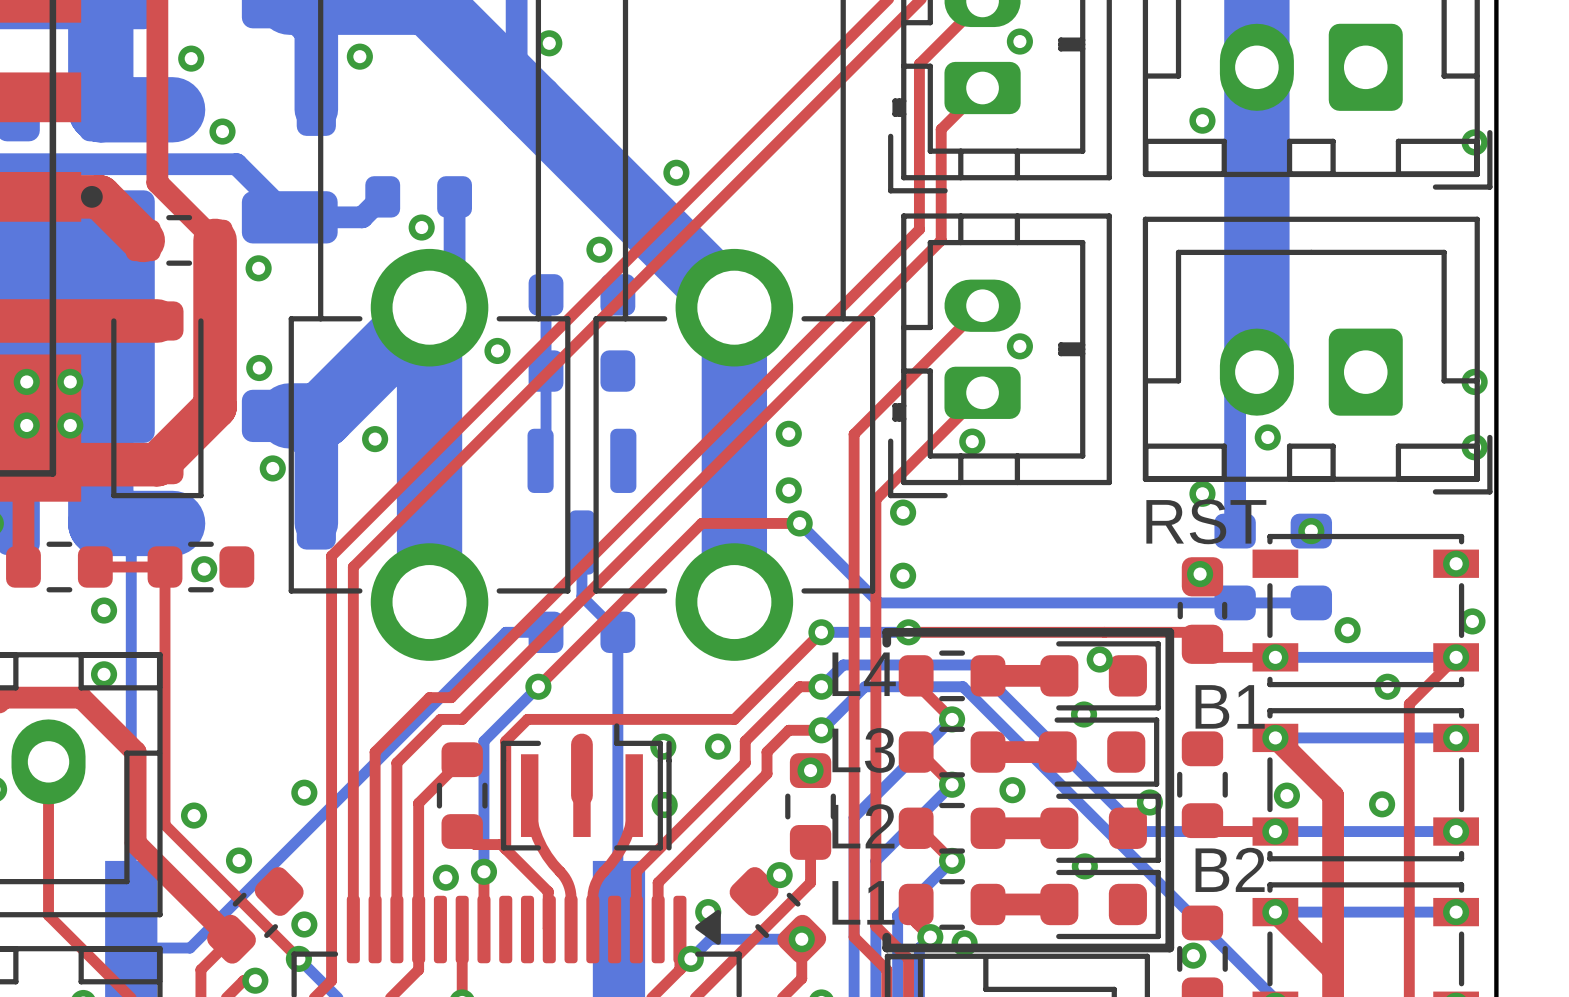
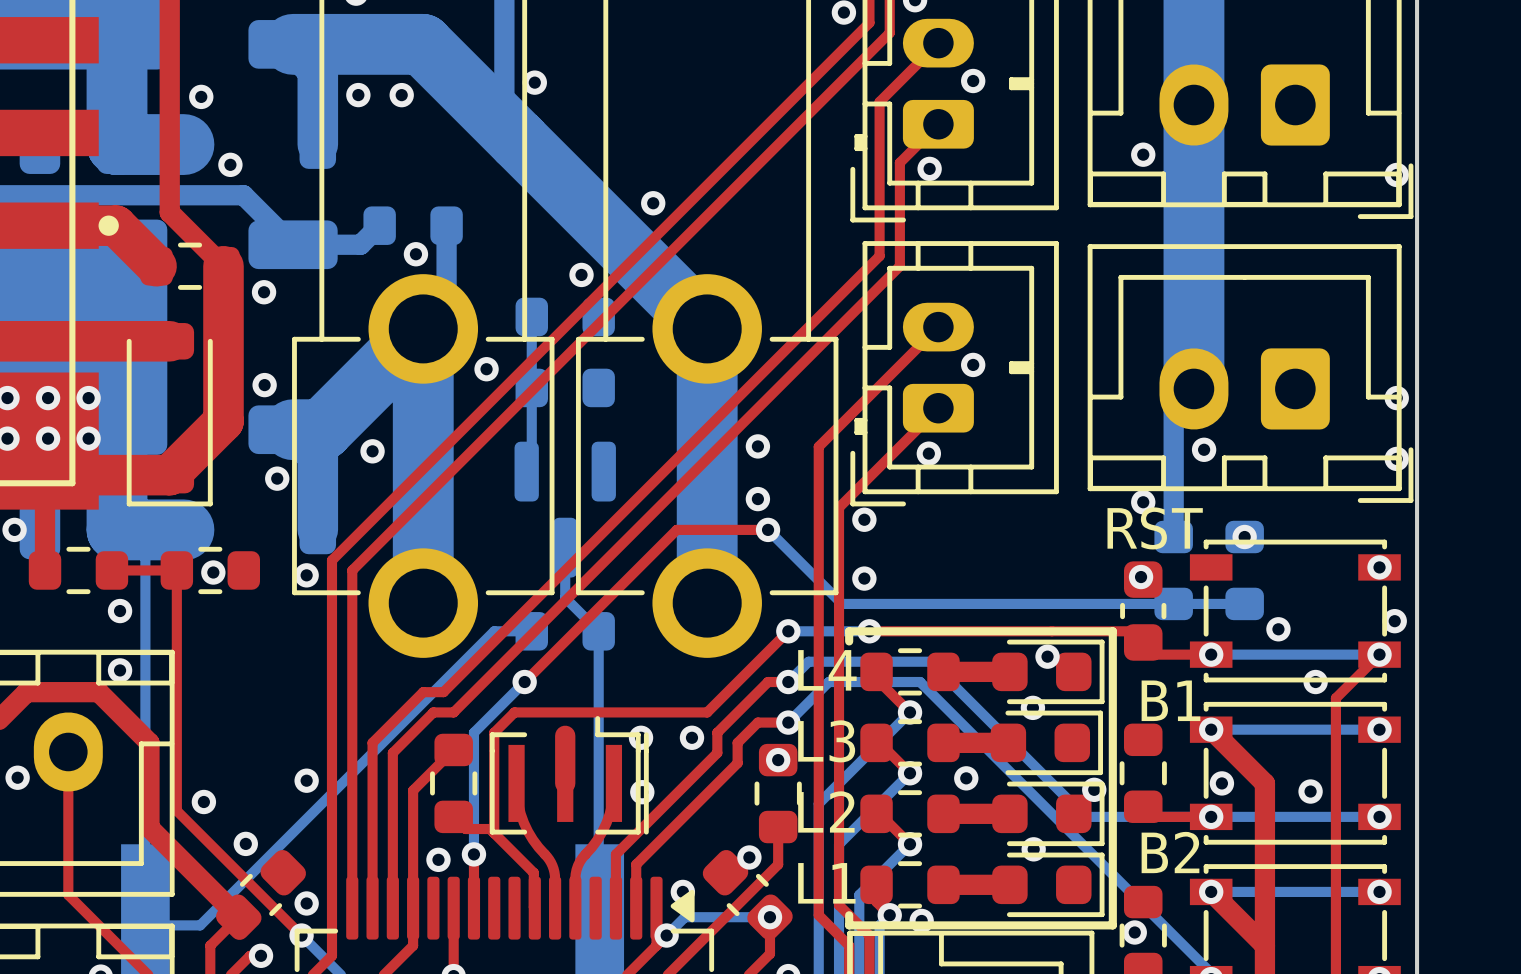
via: none -> (401, 95)
via: none -> (929, 168)
via: none -> (306, 575)

